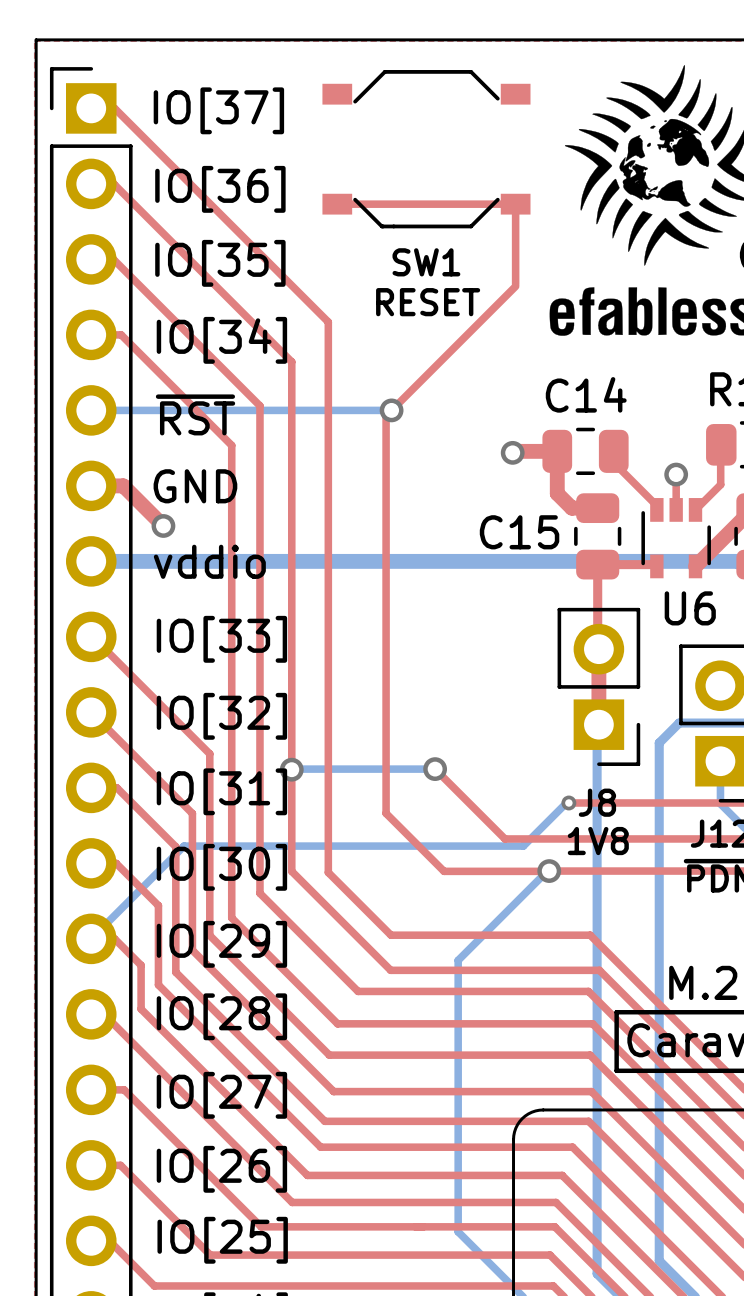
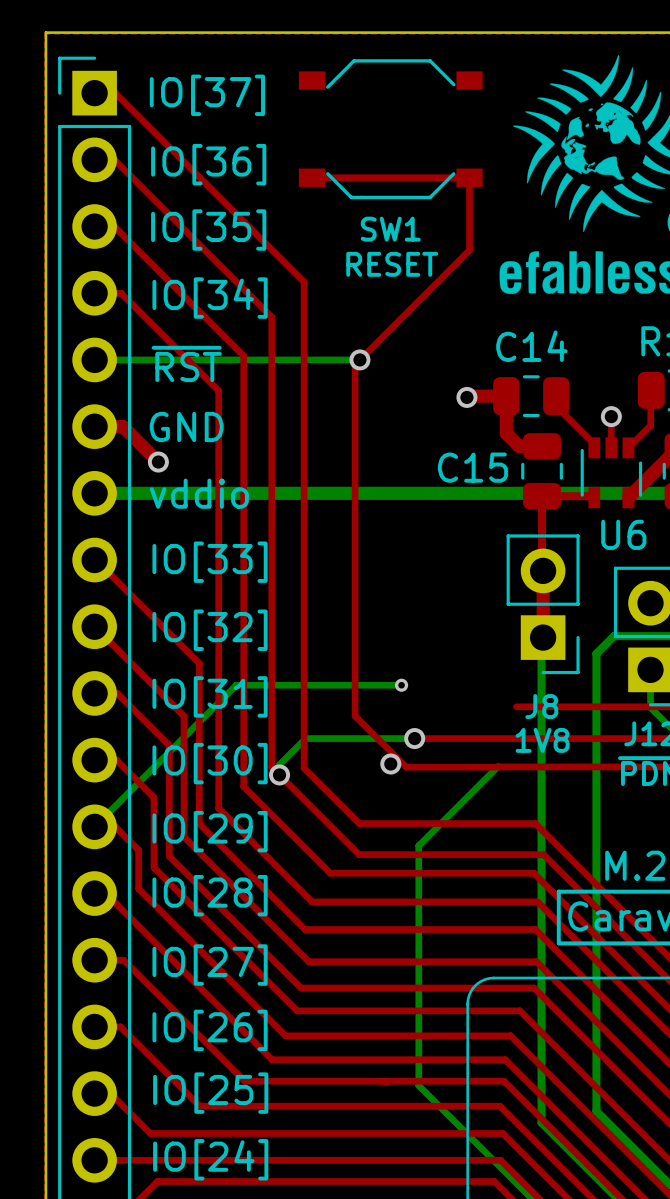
via size: [423, 757, 448, 781] -> [394, 678, 409, 692]
via: (291, 769) -> none
top track: (435, 769) (504, 838) -> (414, 738) (460, 738)
bottom track: (435, 769) (291, 769) -> none
bottom track: (568, 802) (566, 802) (523, 846) (184, 846) -> (401, 685) (236, 685) (176, 744)
via: (568, 802) -> none
bottom track: none -> (414, 738) (305, 738) (279, 764) (279, 774)
via: none -> (414, 738)
via: none -> (390, 764)
via: (549, 871) -> none
via: none -> (279, 774)

